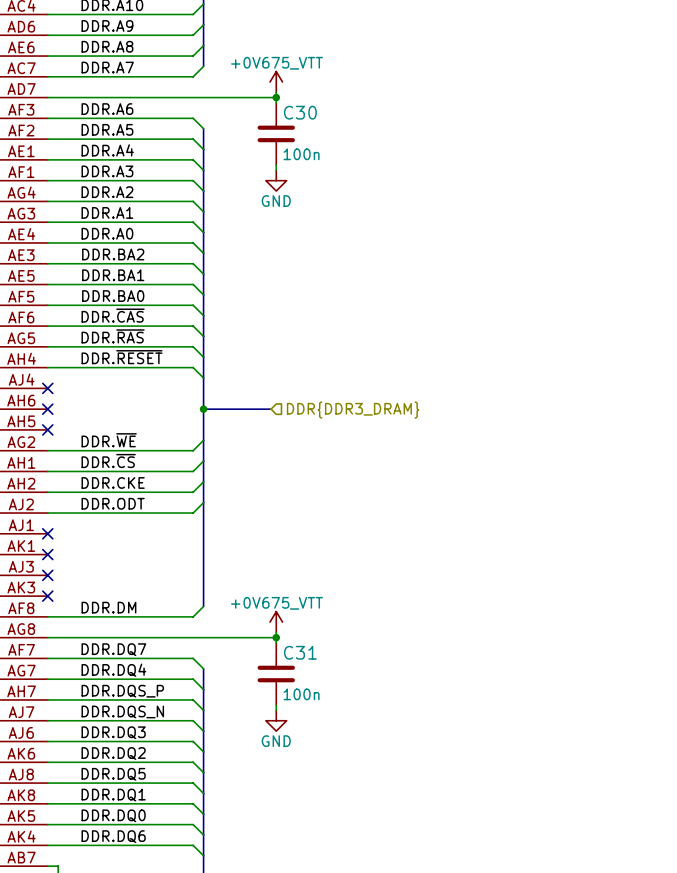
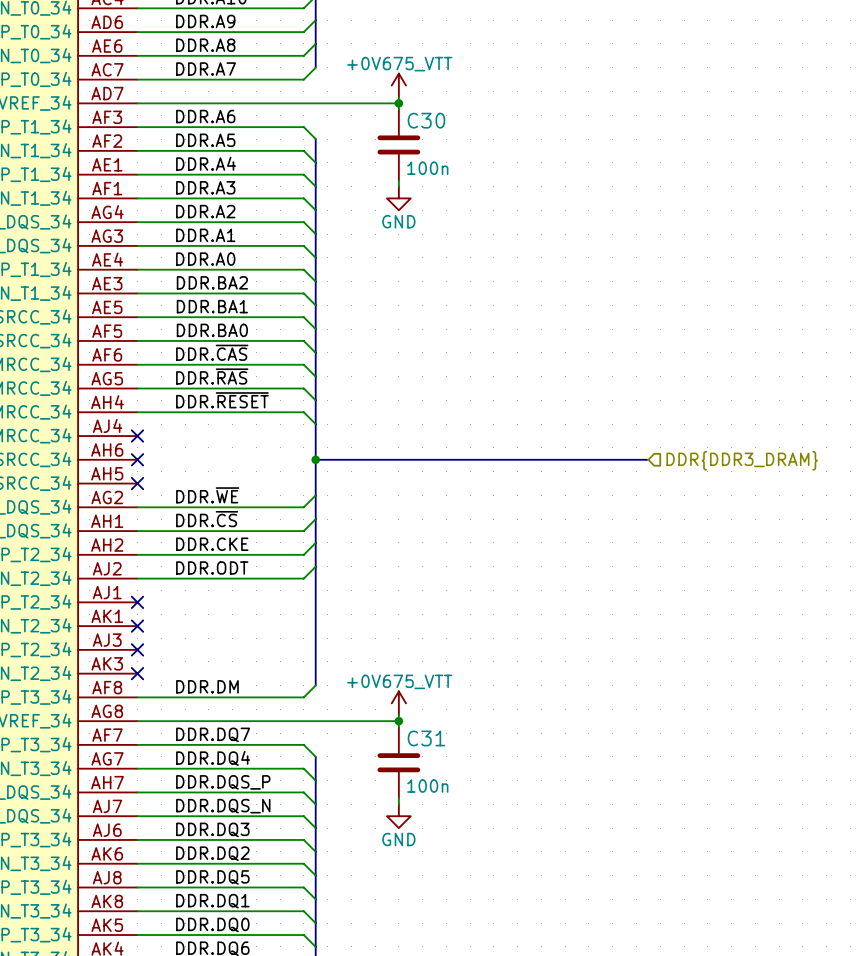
bus: none -> (392, 459) (648, 459)
hierarchical label: DDR{DDR3_DRAM} (353, 410) -> none
hierarchical label: none -> DDR{DDR3_DRAM} (742, 460)

